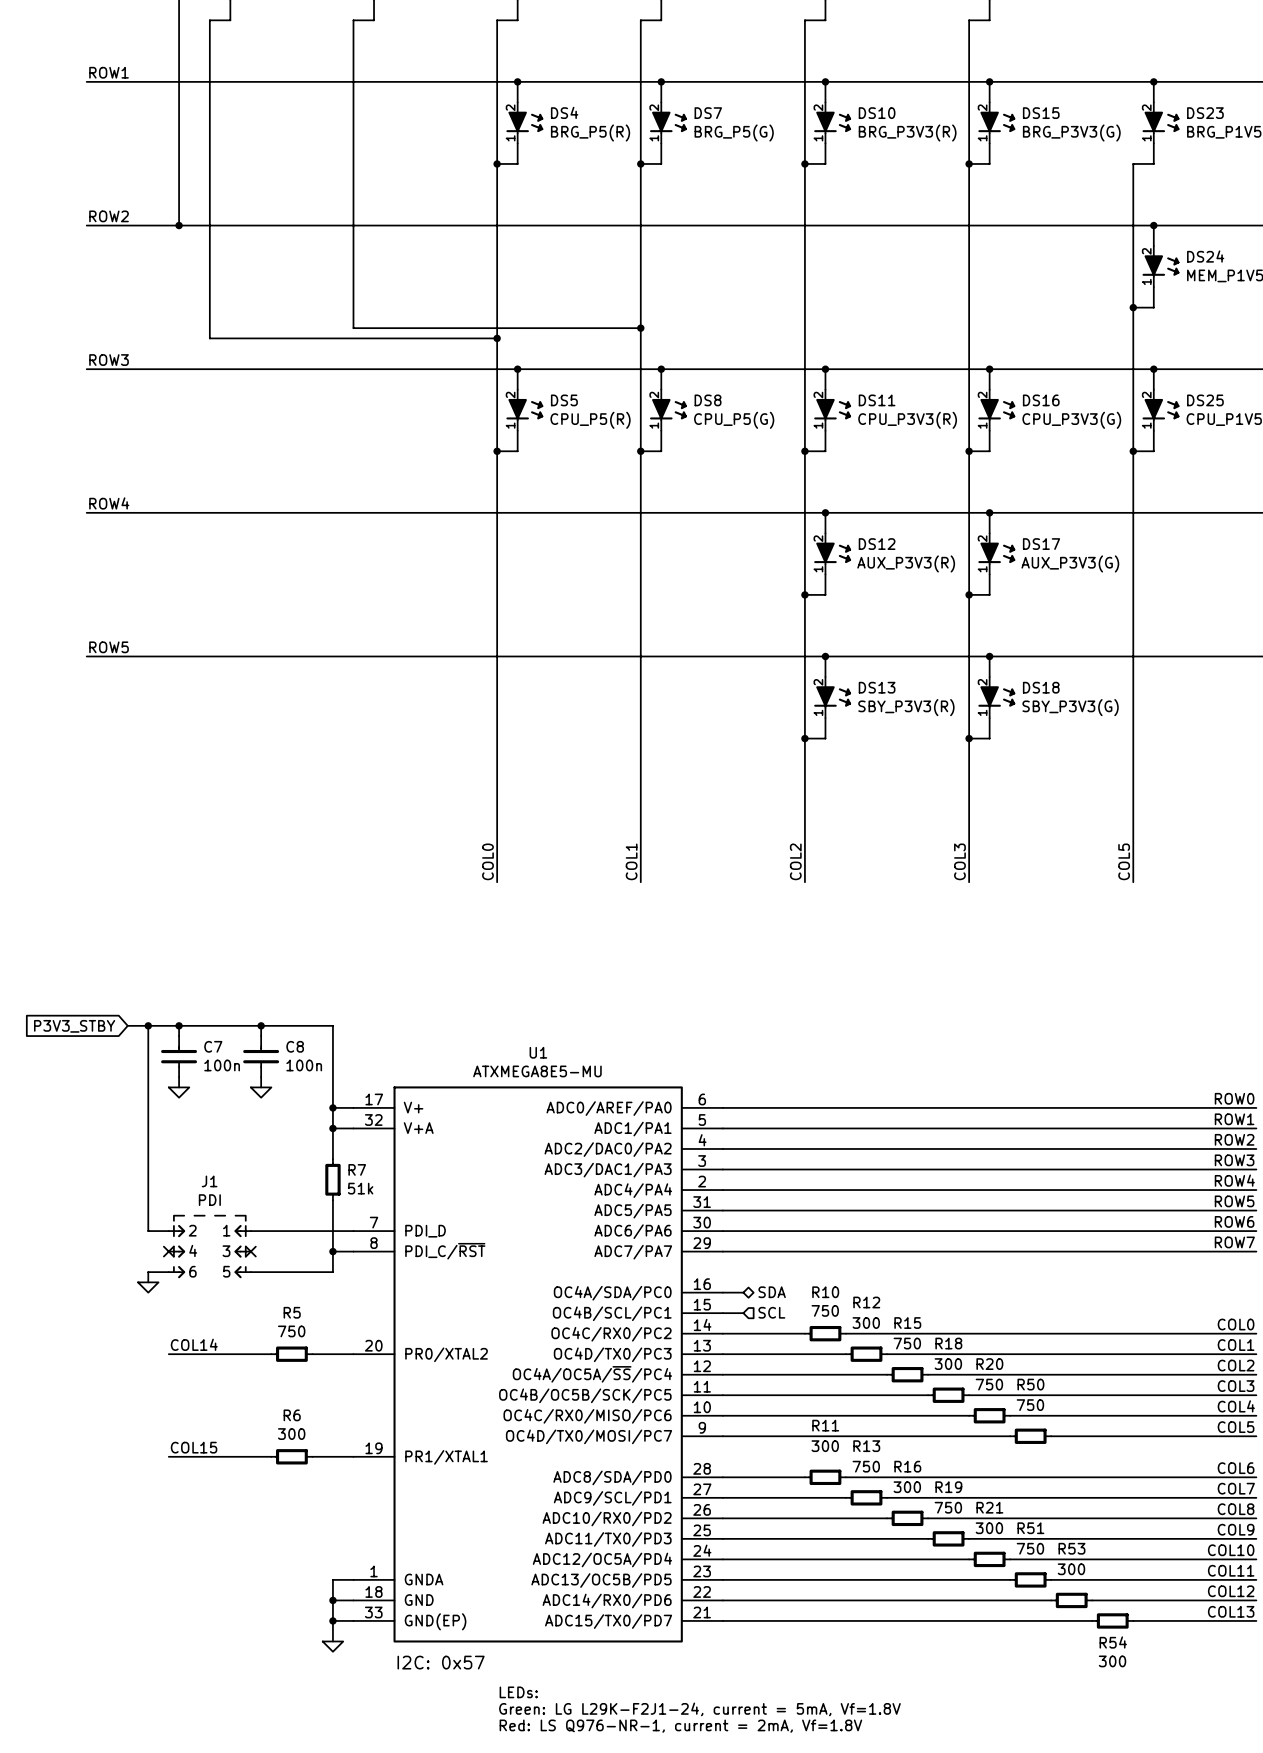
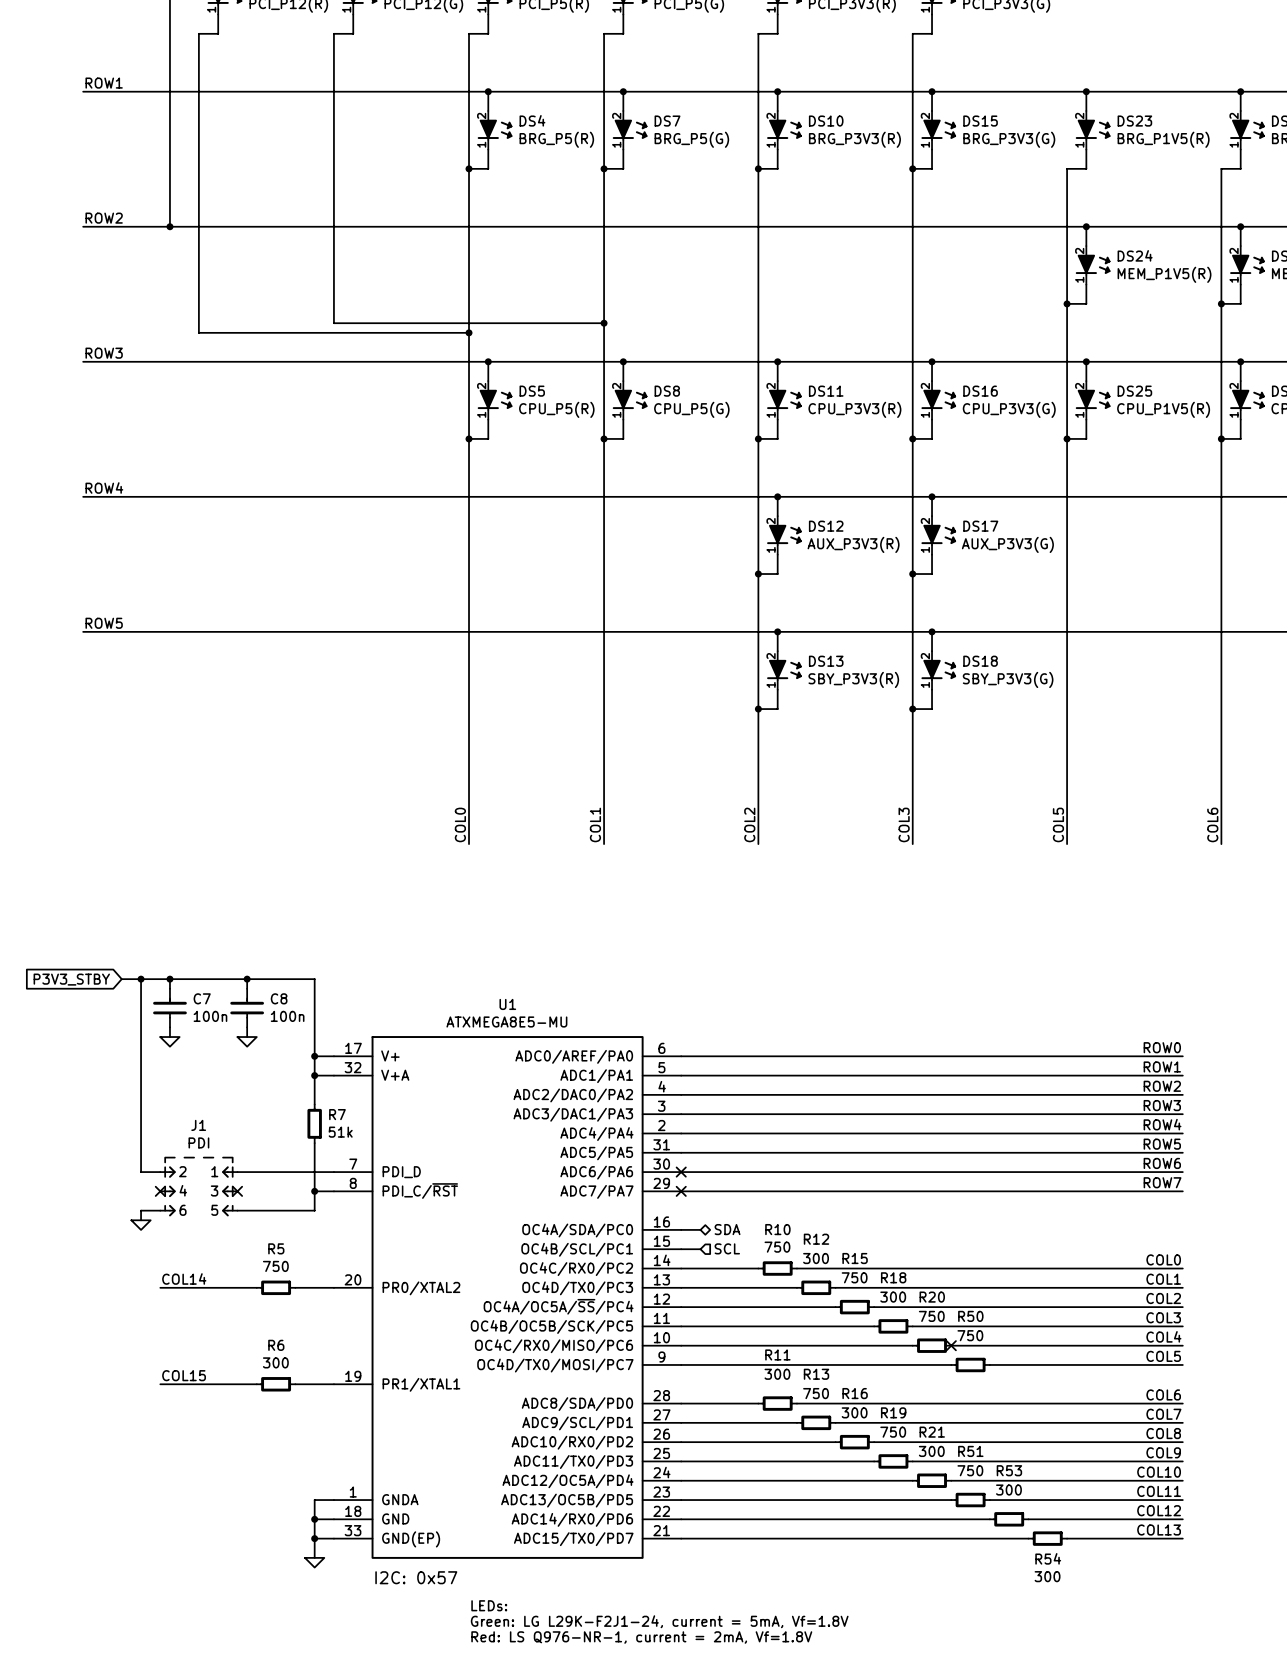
no-connect mark: none -> (681, 1172)
no-connect mark: none -> (681, 1191)
no-connect mark: none -> (951, 1345)

